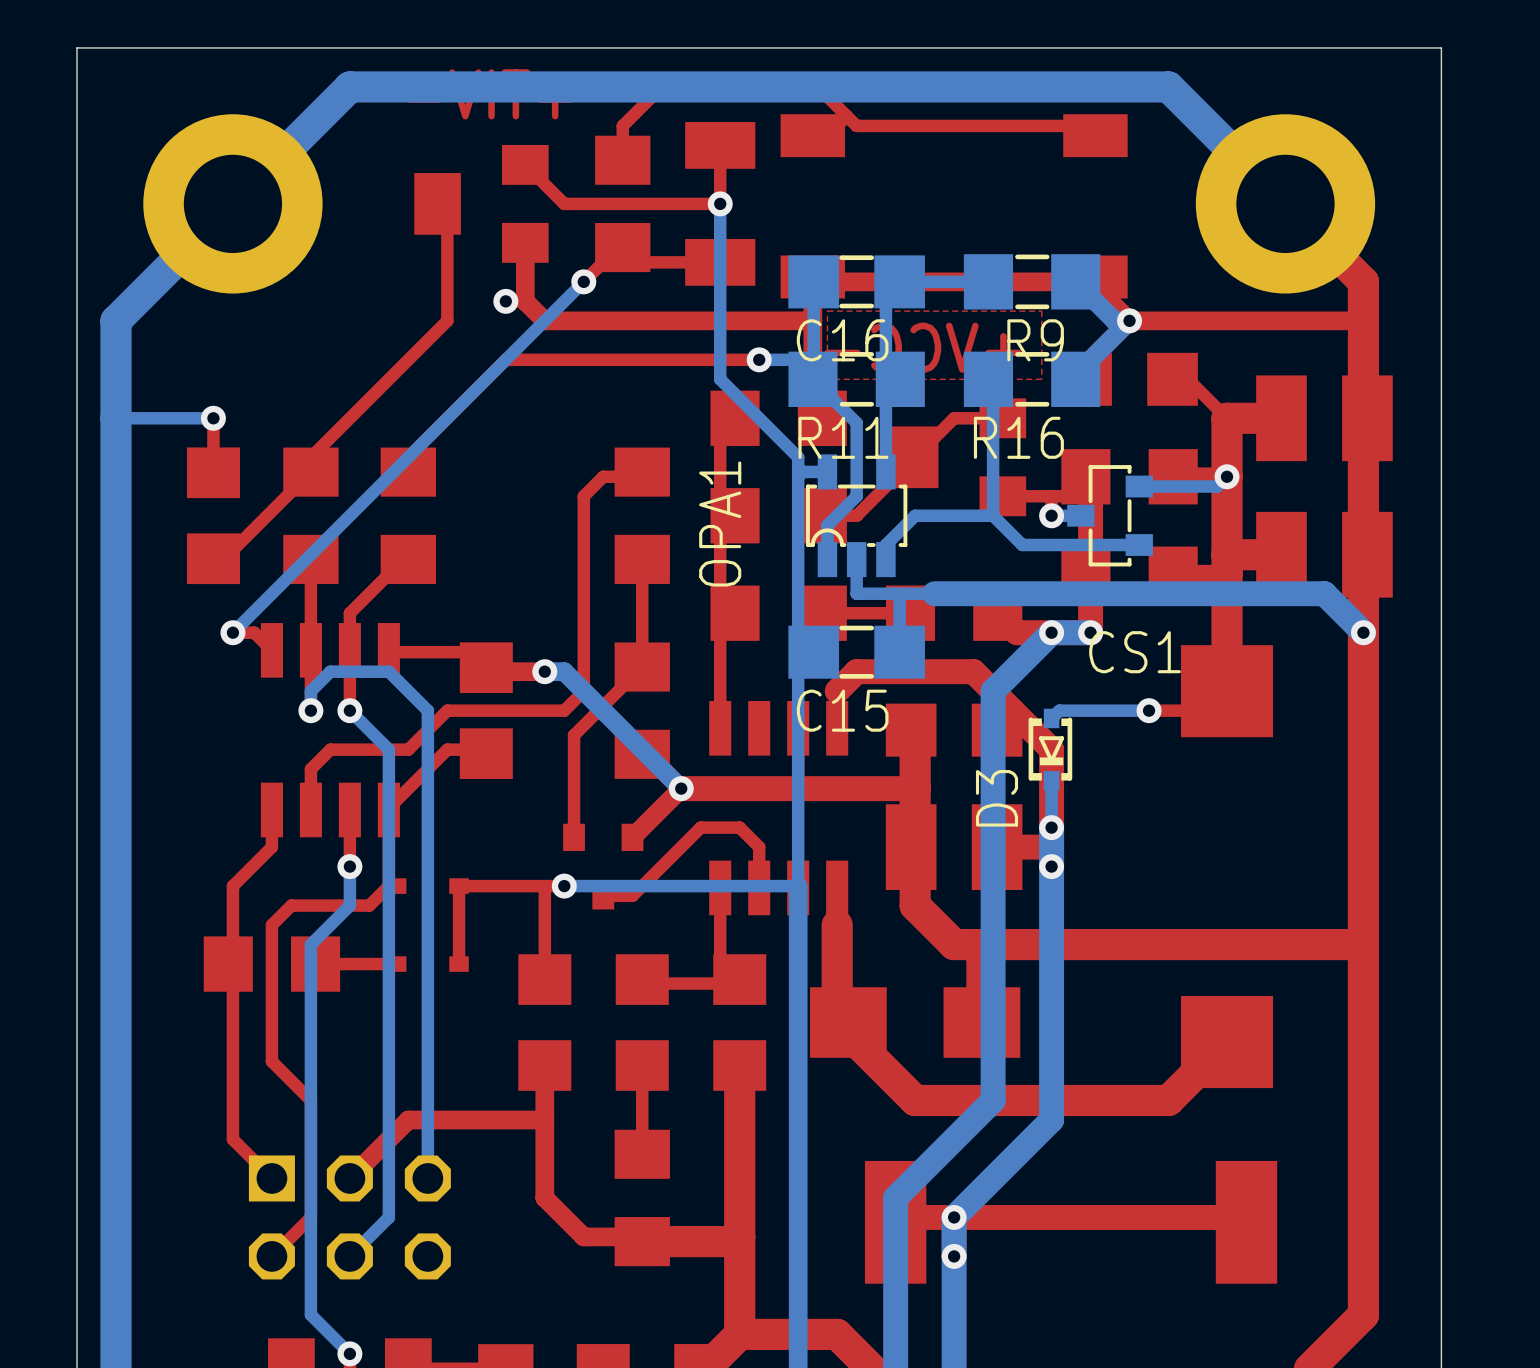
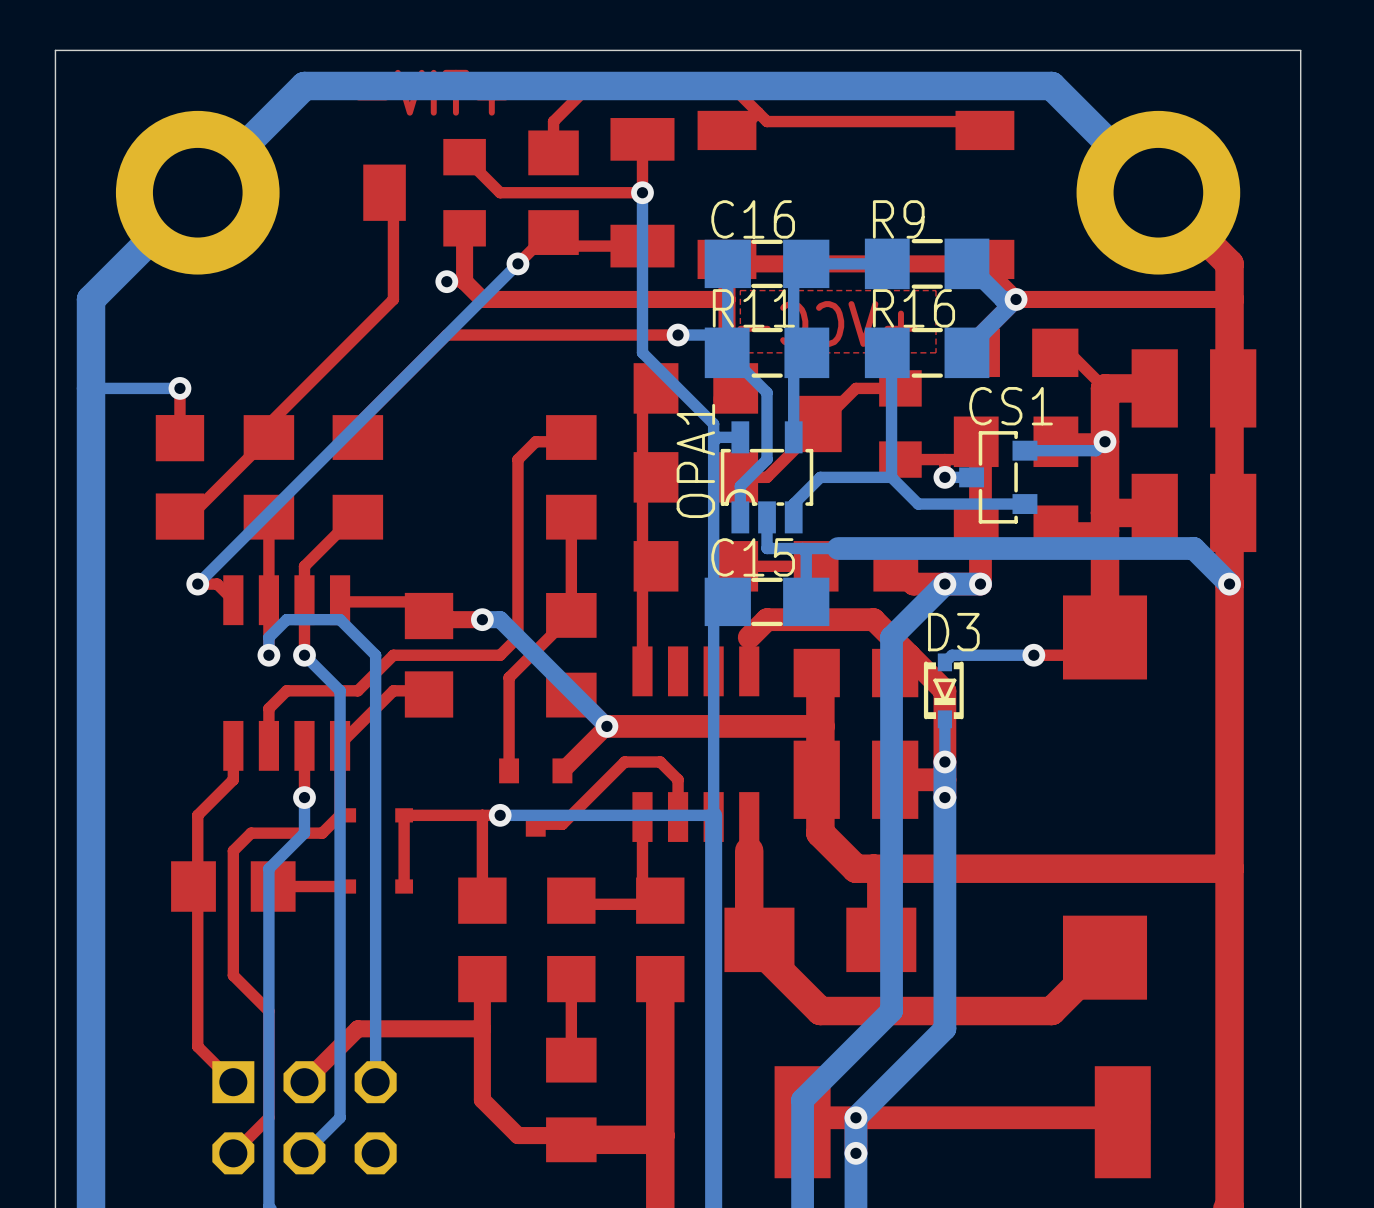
C16 name position: C16 (842, 340) -> C16 (753, 219)
R9 name position: R9 (1035, 340) -> R9 (898, 219)
R11 name position: R11 (843, 437) -> R11 (753, 308)
R16 name position: R16 (1018, 437) -> R16 (913, 308)
OPA1 name position: OPA1 (720, 524) -> OPA1 (695, 460)
CS1 name position: CS1 (1135, 652) -> CS1 (1011, 406)
C15 name position: C15 (842, 710) -> C15 (753, 557)
D3 name rotation: 0° (997, 798) -> 90° clockwise (953, 632)
D3 name position: D3 (997, 798) -> D3 (953, 632)

